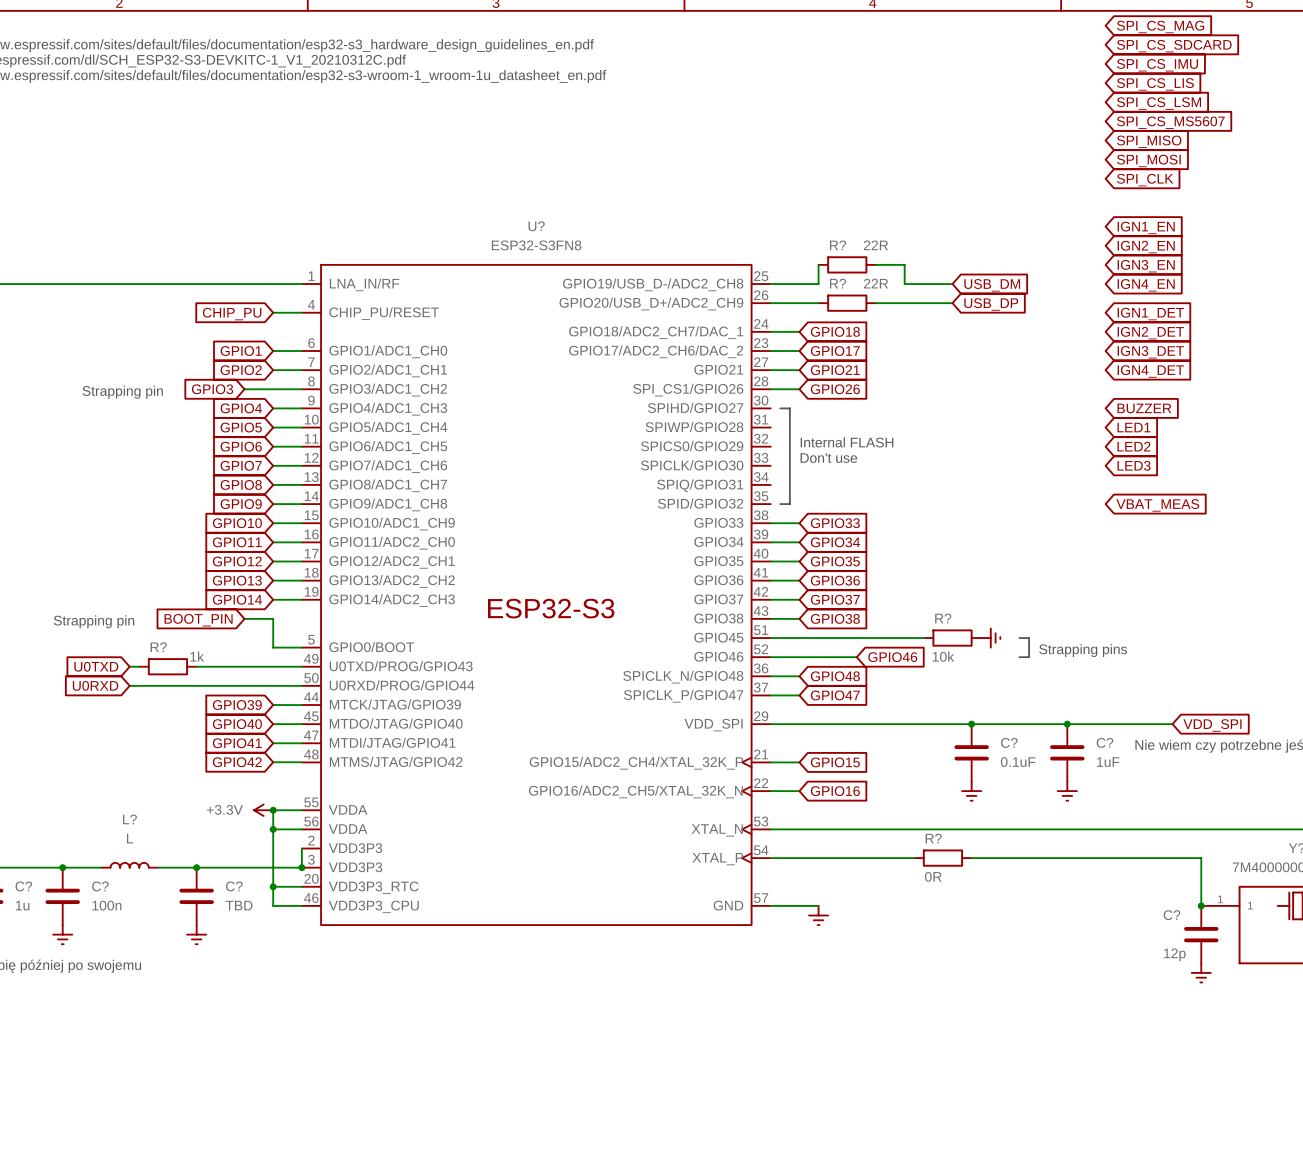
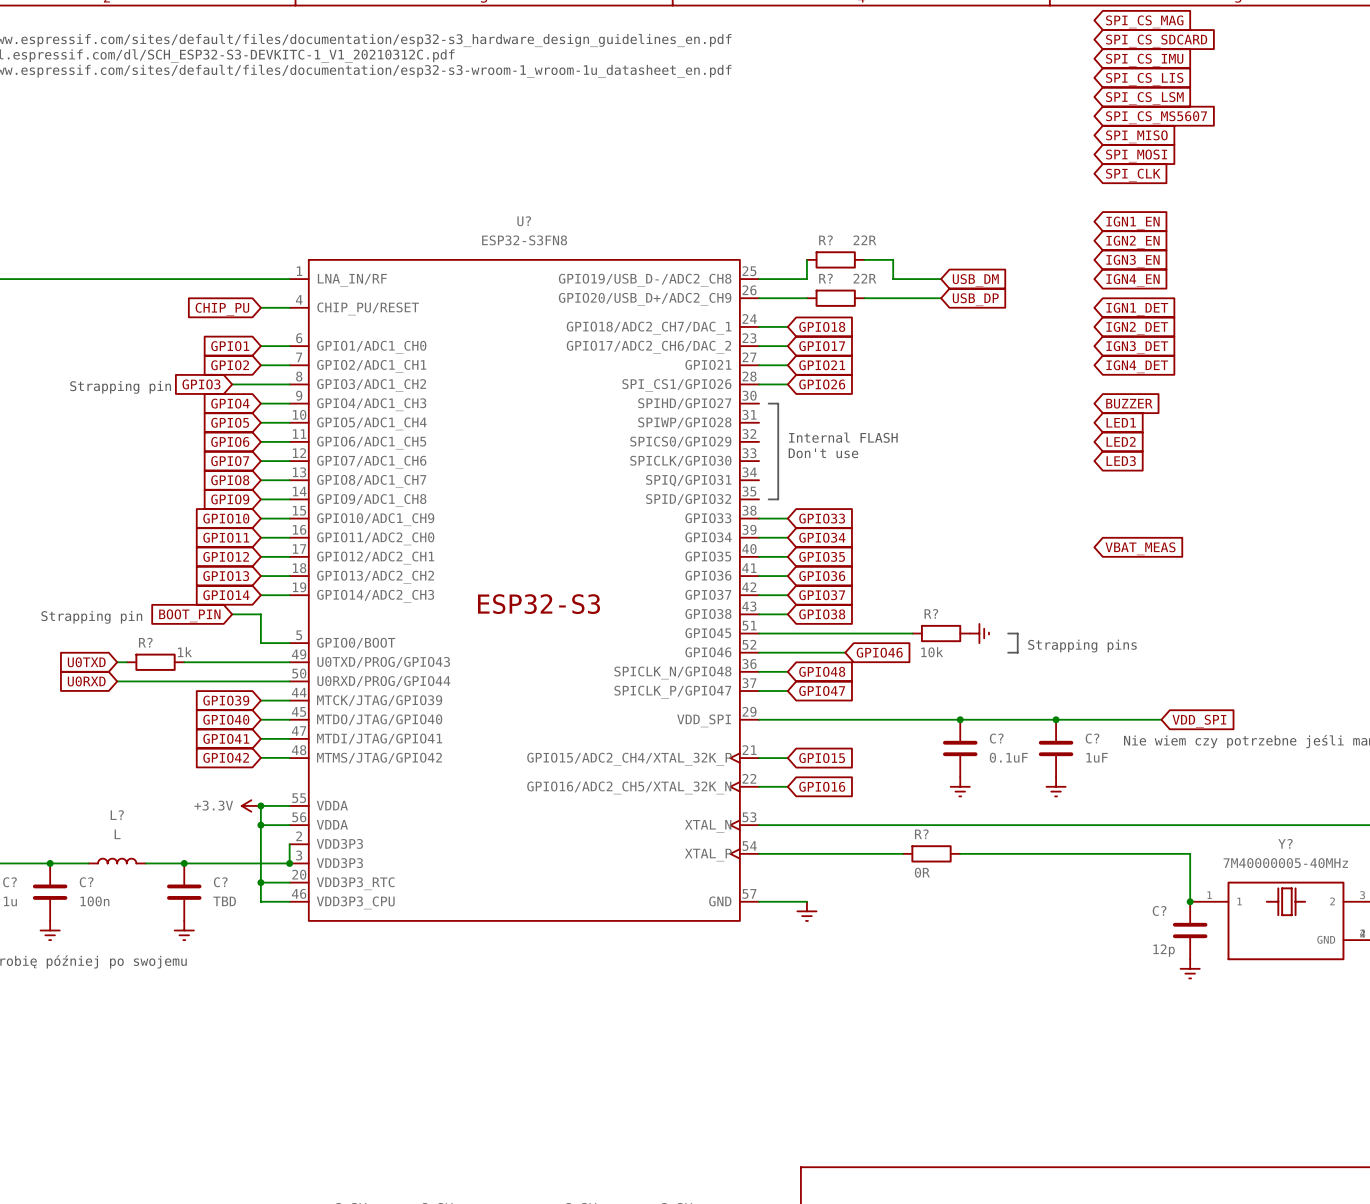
global label position: VBAT_MEAS (1157, 505) -> VBAT_MEAS (1140, 548)

